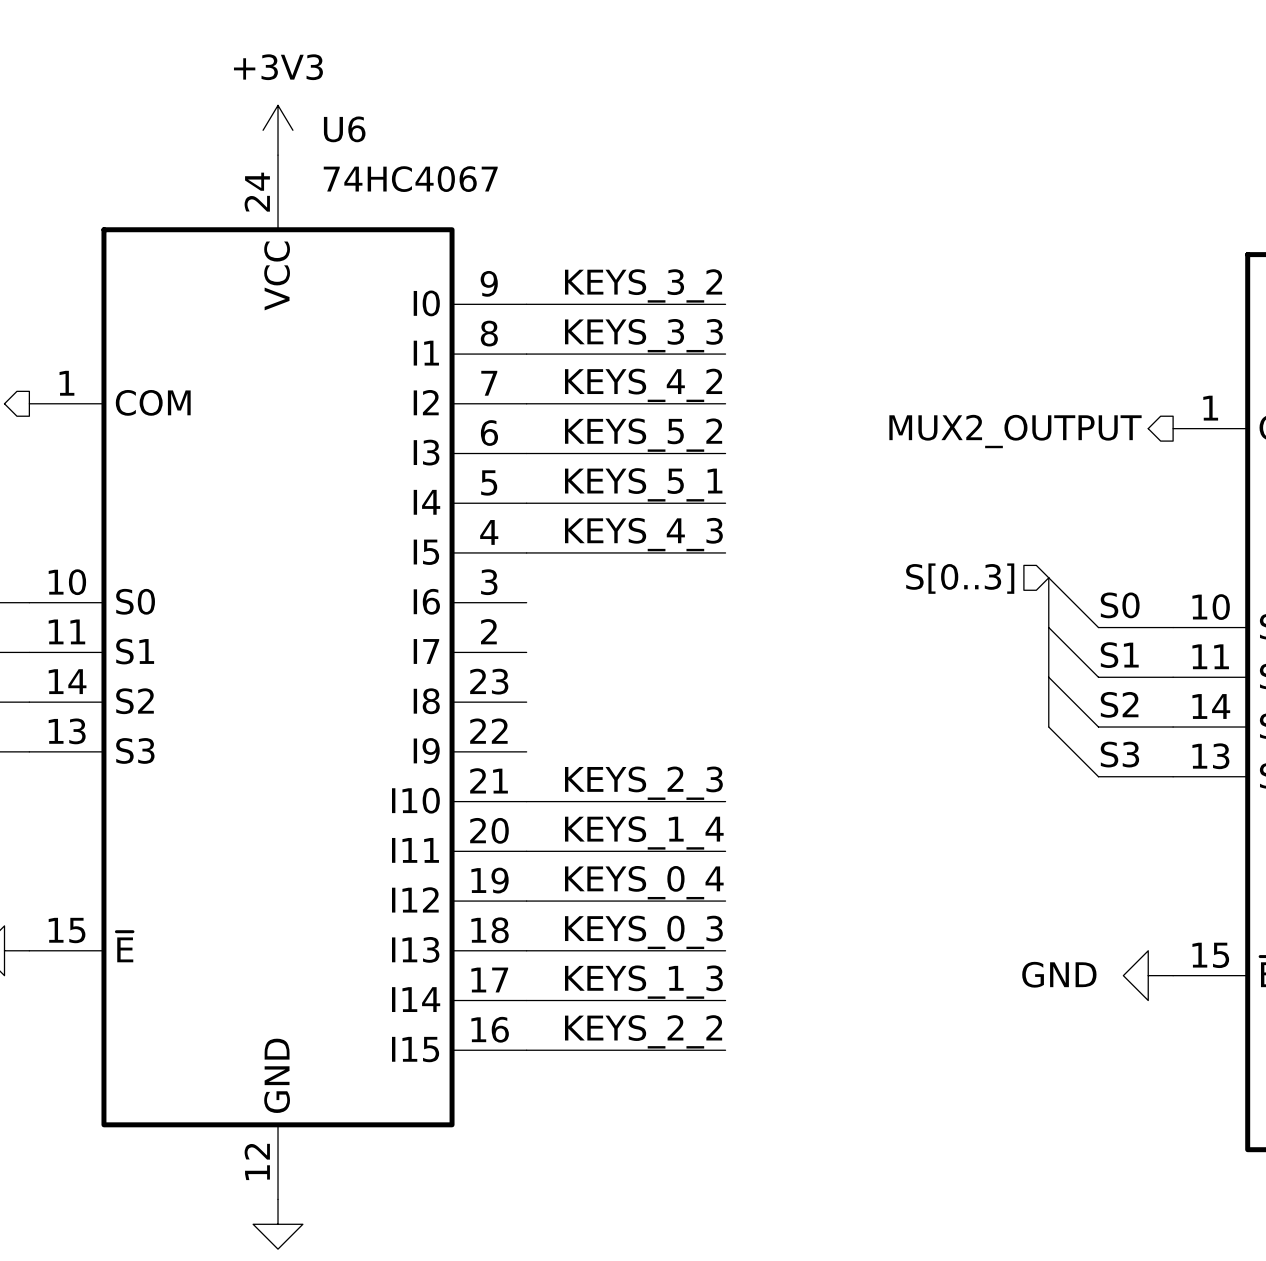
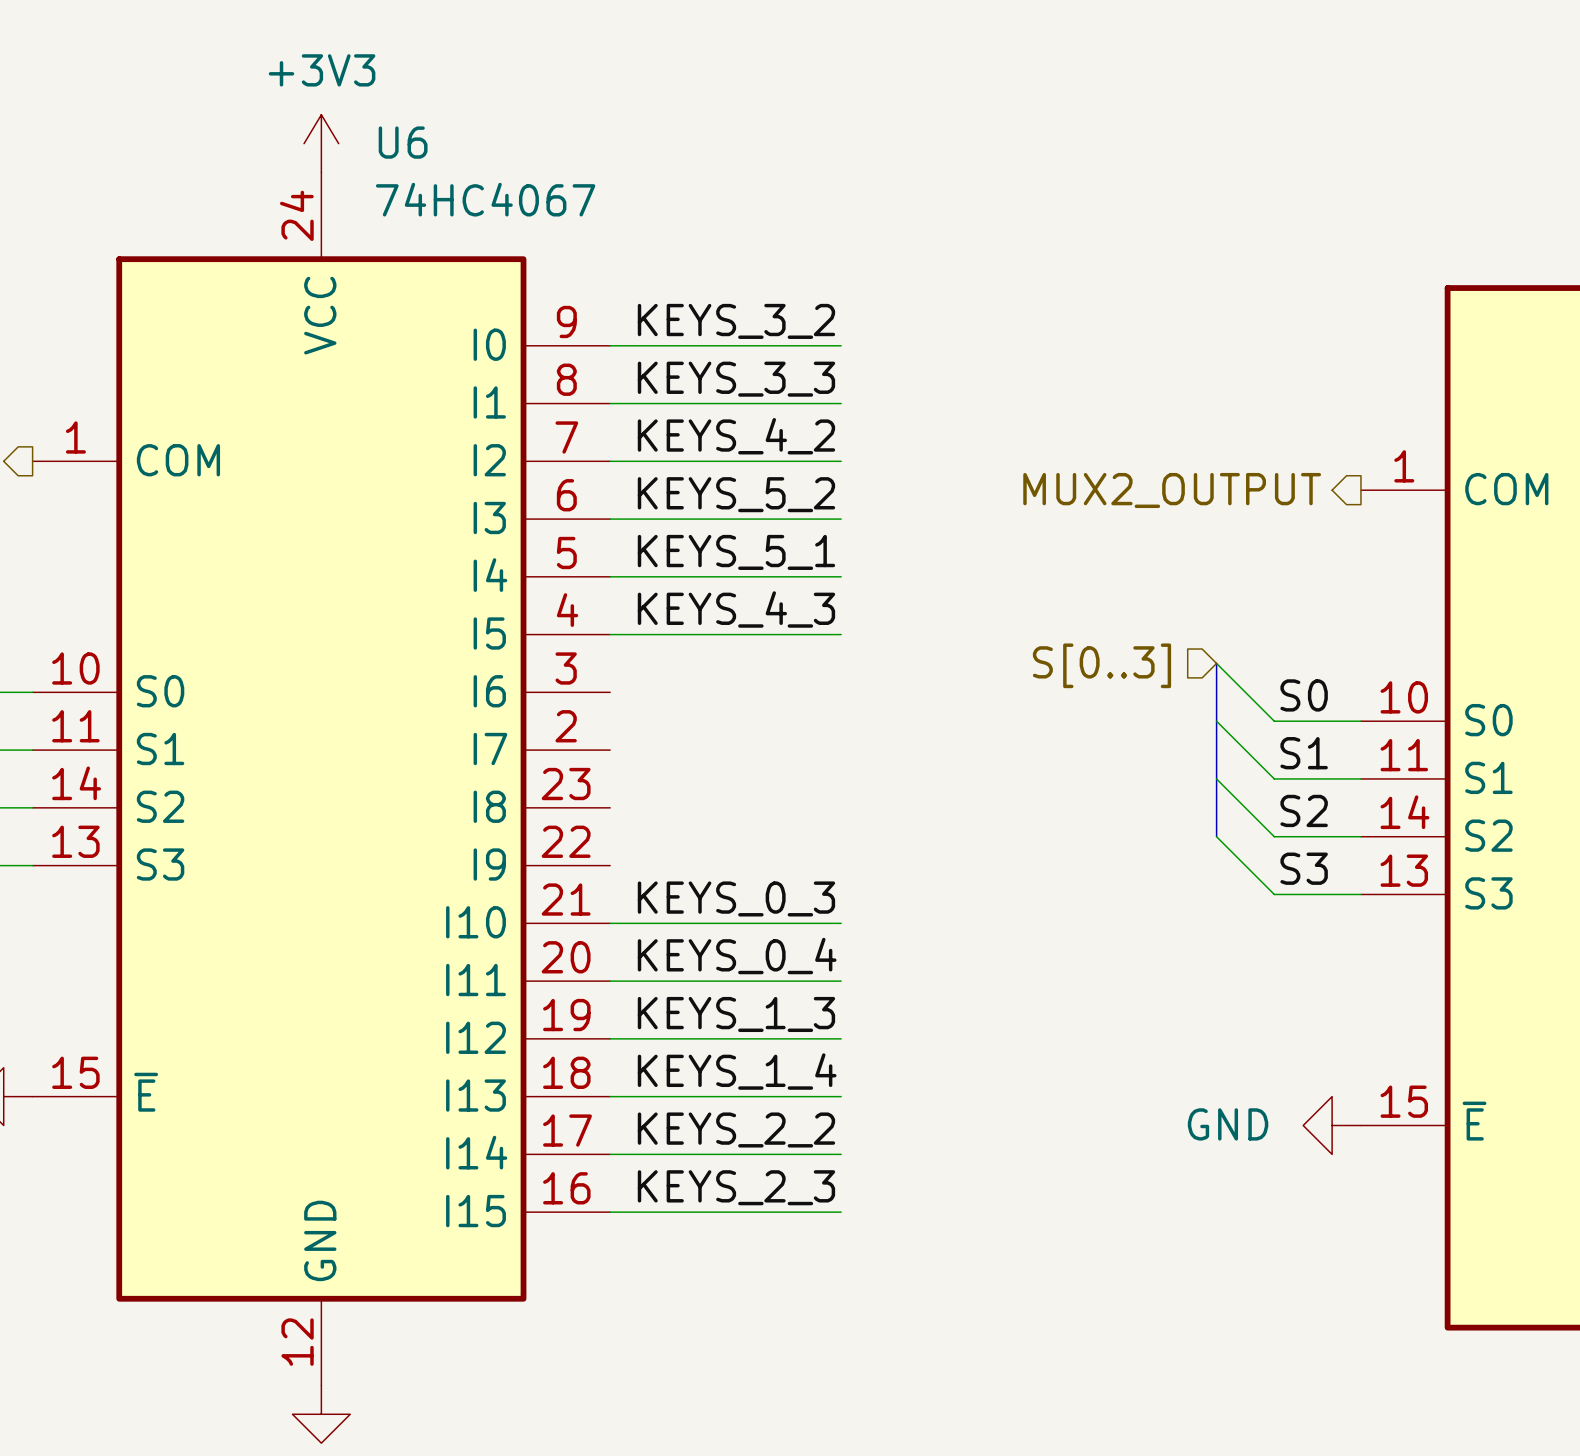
label: KEYS_2_3 (643, 783) -> KEYS_0_3 (736, 898)
label: KEYS_1_4 (644, 832) -> KEYS_0_4 (737, 956)
label: KEYS_0_4 (644, 882) -> KEYS_1_3 (736, 1014)
label: KEYS_0_3 (643, 932) -> KEYS_1_4 (737, 1071)
label: KEYS_1_3 (643, 982) -> KEYS_2_2 (736, 1129)
label: KEYS_2_2 (643, 1031) -> KEYS_2_3 (736, 1187)

